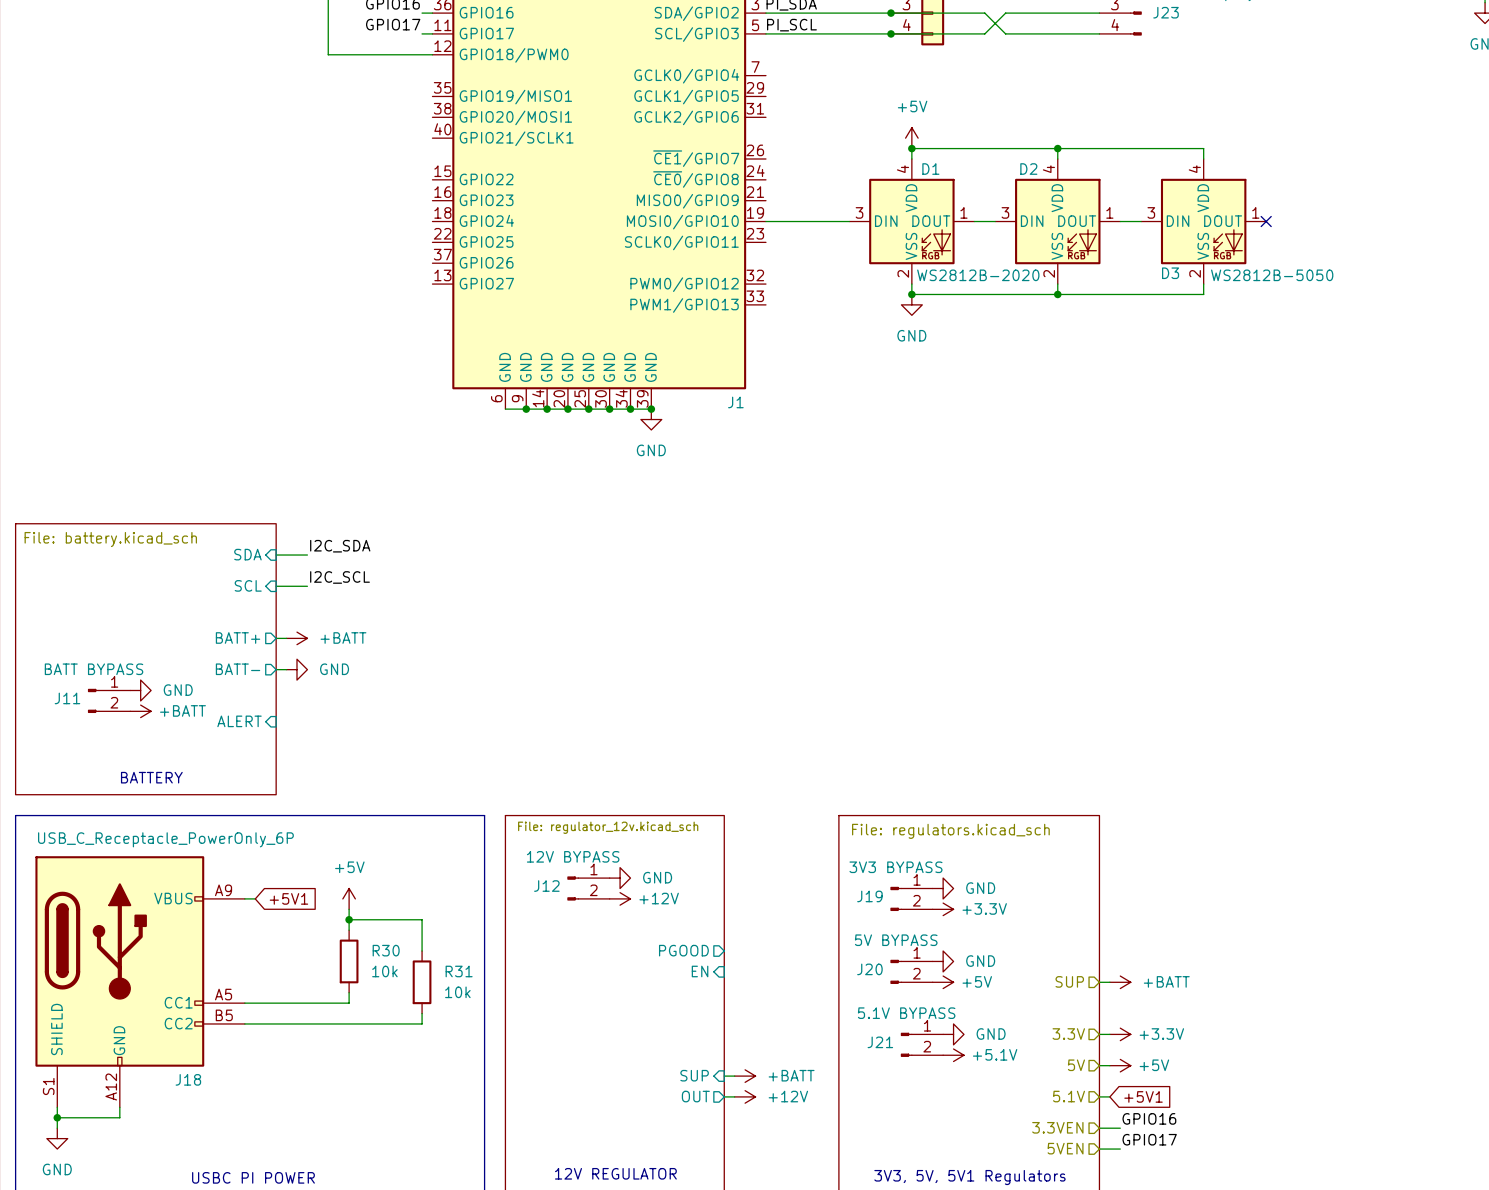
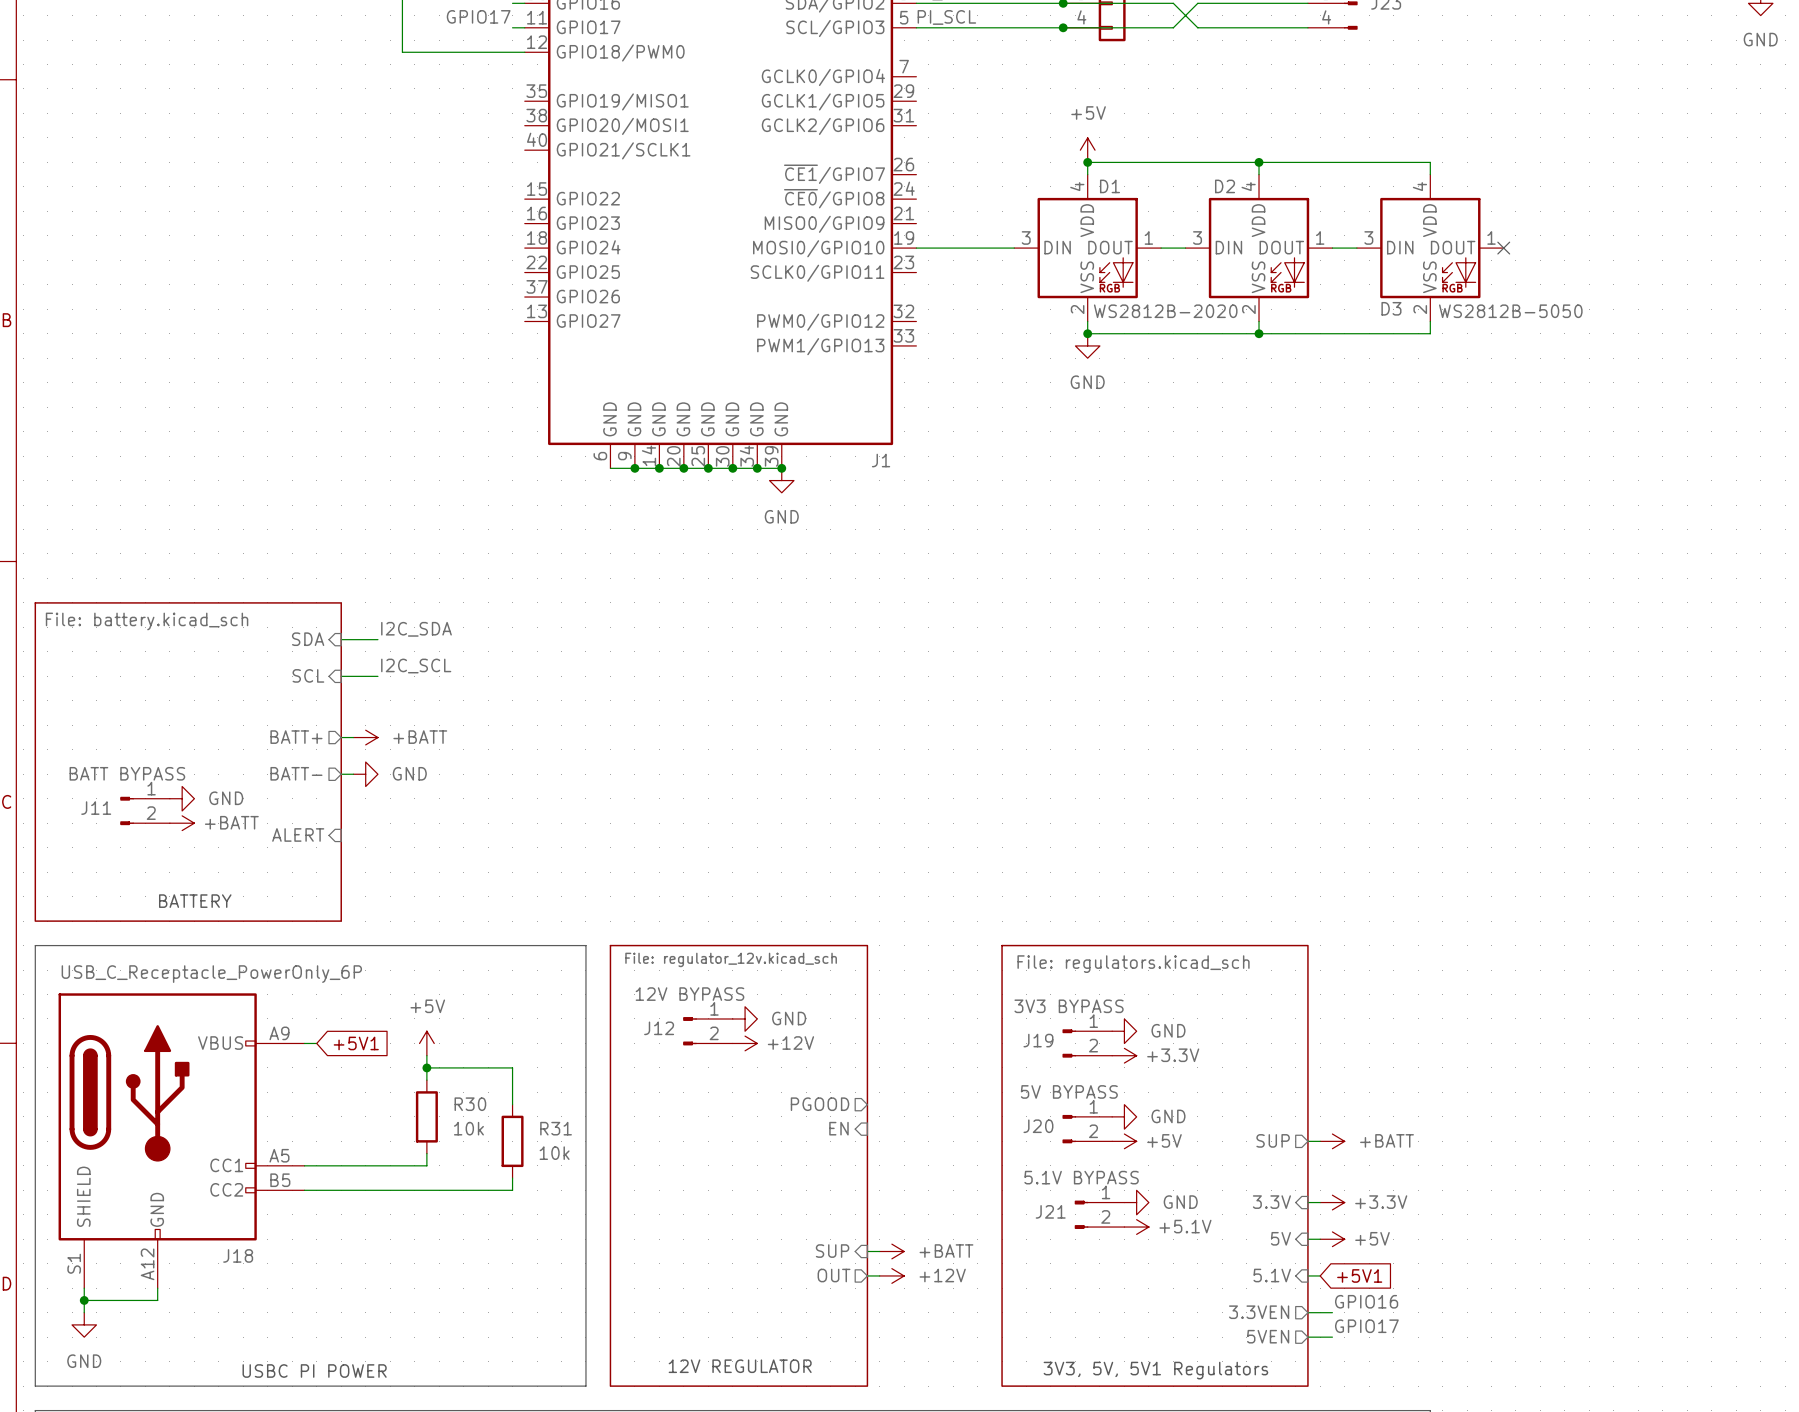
hierarchical label shape: input (1068, 1034) -> output (1271, 1202)
hierarchical label shape: input (1076, 1065) -> output (1280, 1238)
hierarchical label shape: input (1069, 1096) -> output (1272, 1275)

